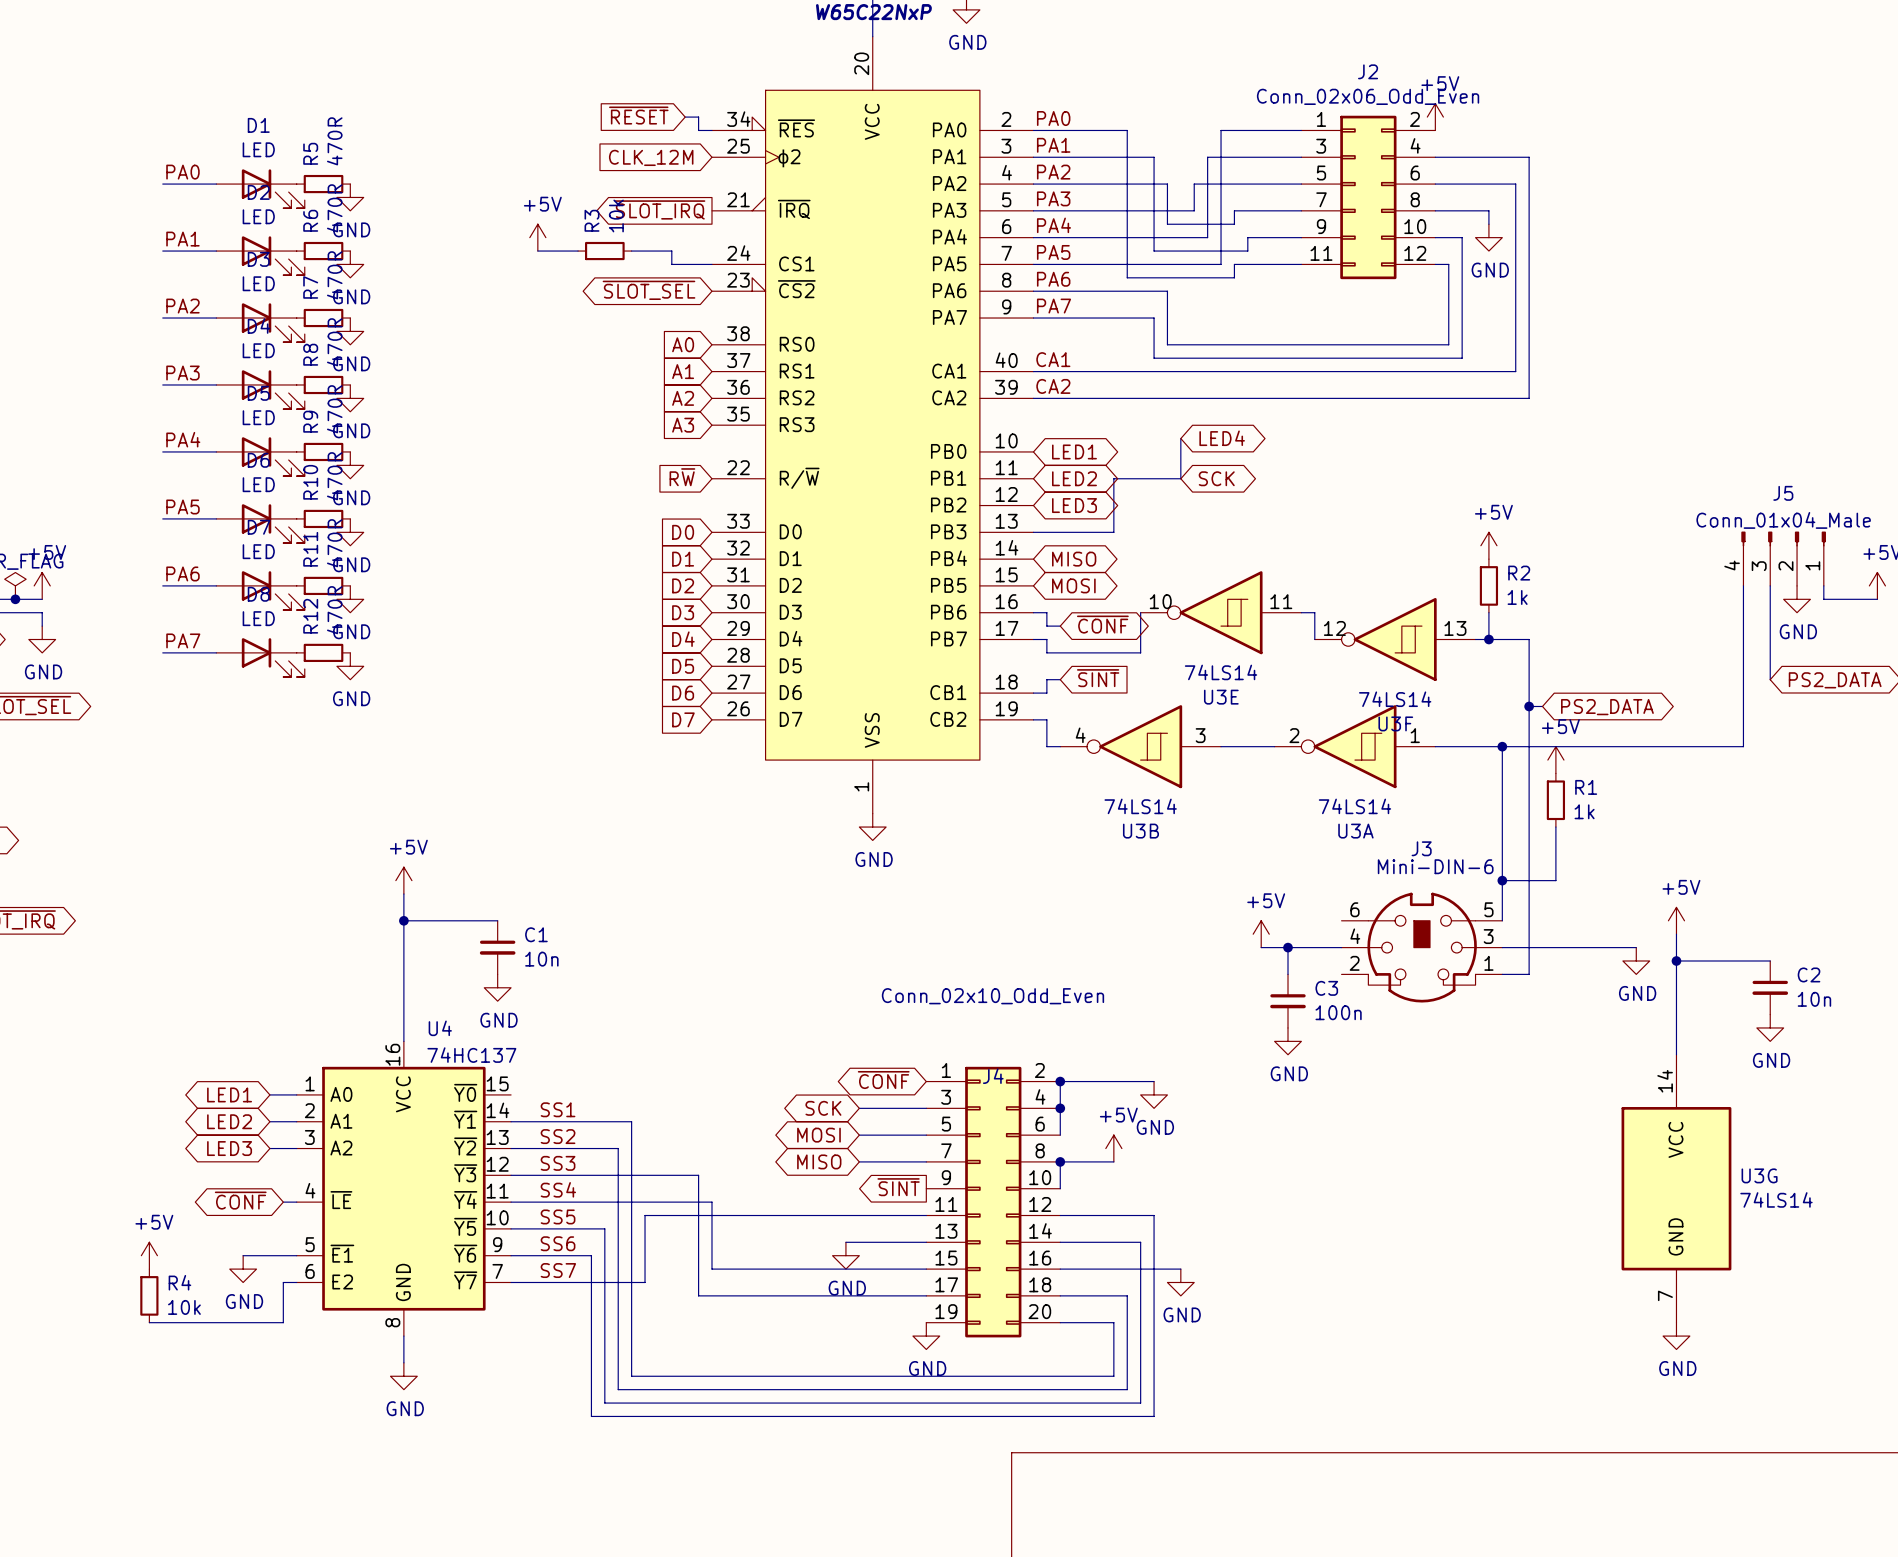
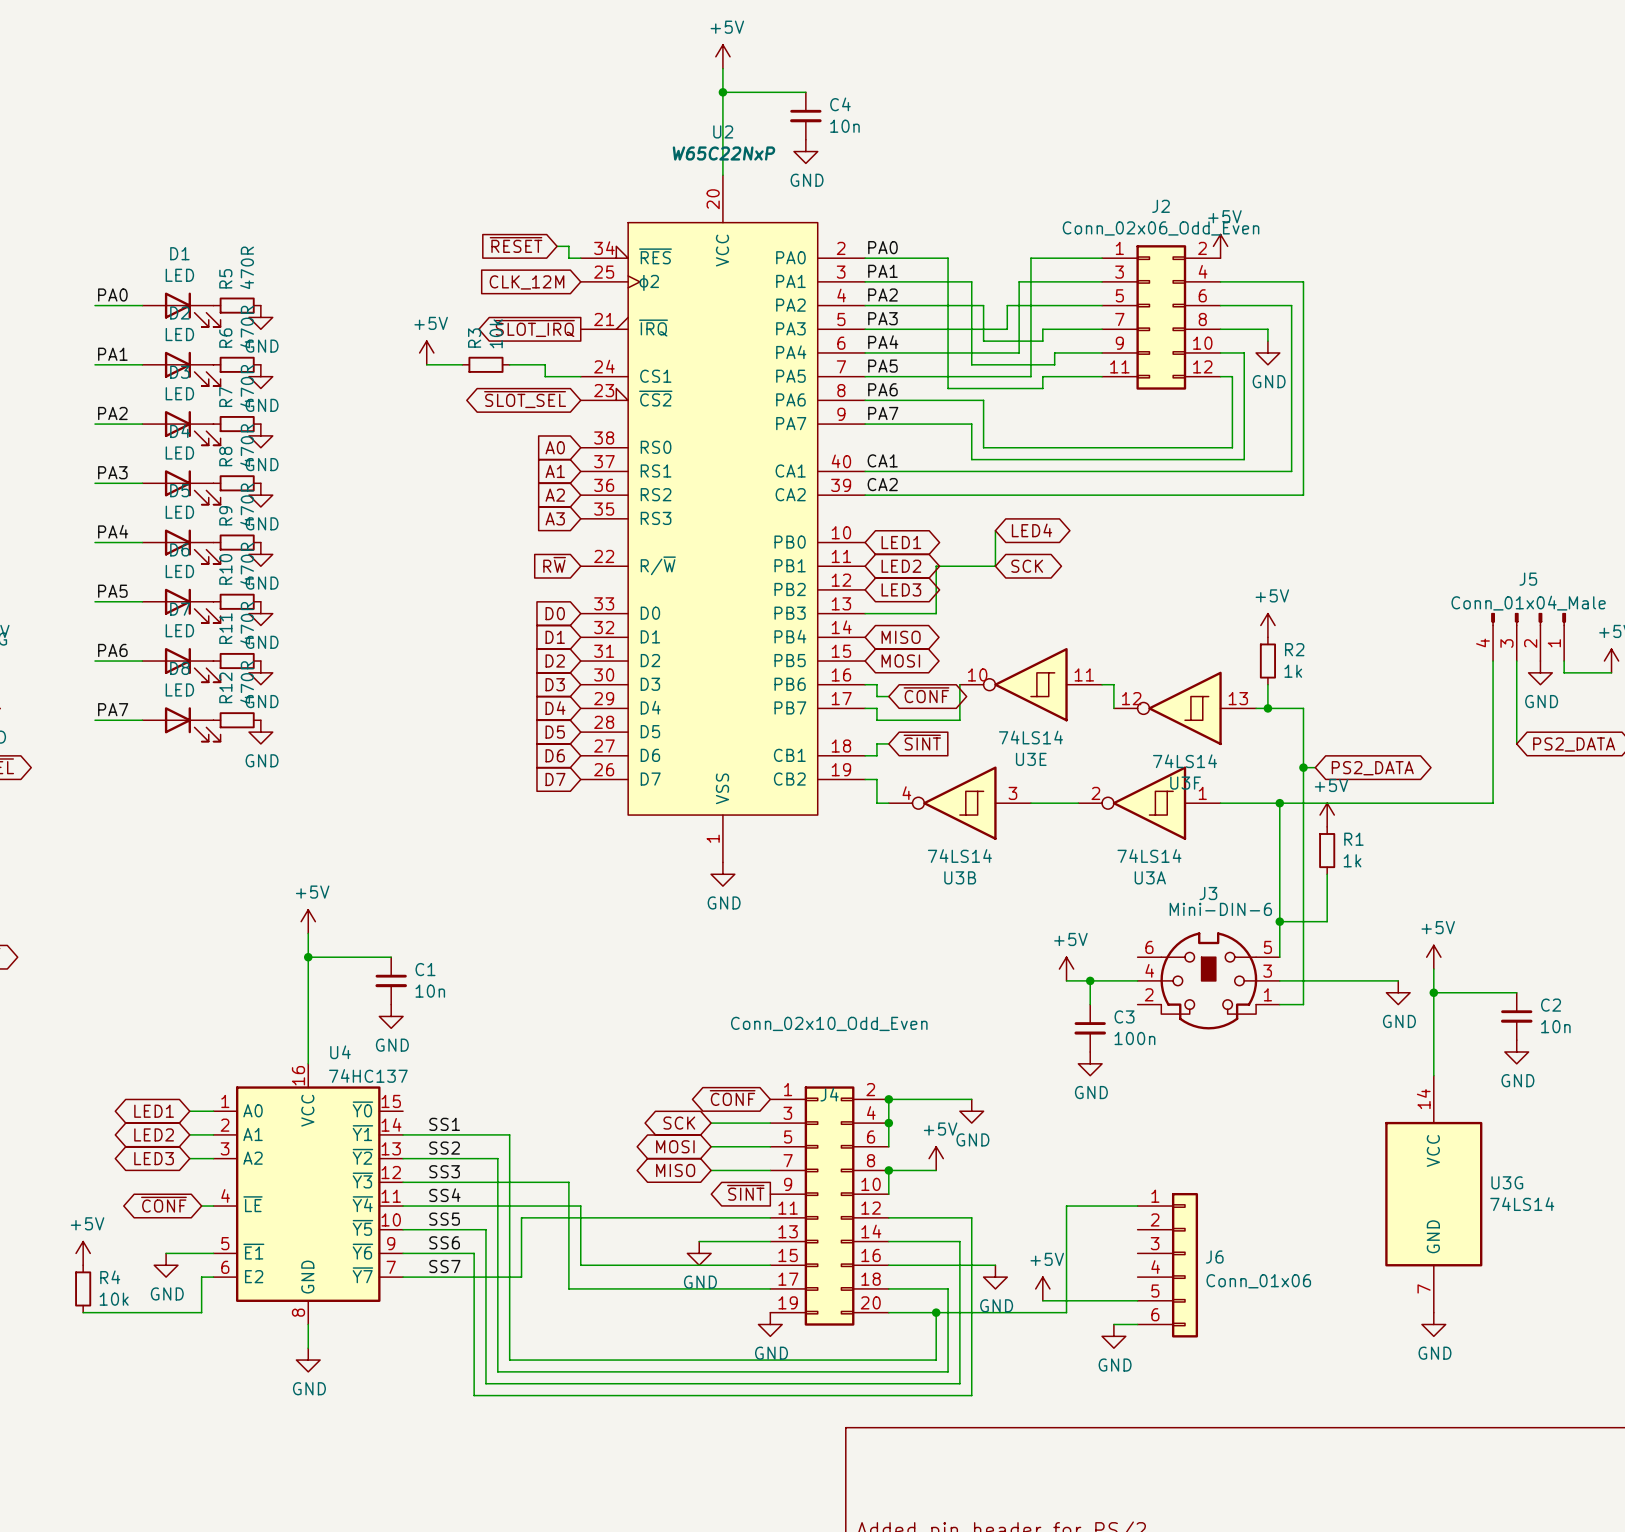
wire: none -> (1137, 1206) (1066, 1206) (1066, 1312) (936, 1312)
J6: none -> Conn_01x06 (1167, 1265)
power symbol: none -> +5V (1042, 1288)
wire: none -> (1042, 1300) (1137, 1300)
junction: none -> (936, 1312)
wire: none -> (1113, 1324) (1137, 1324)
power symbol: none -> GND (1113, 1336)

